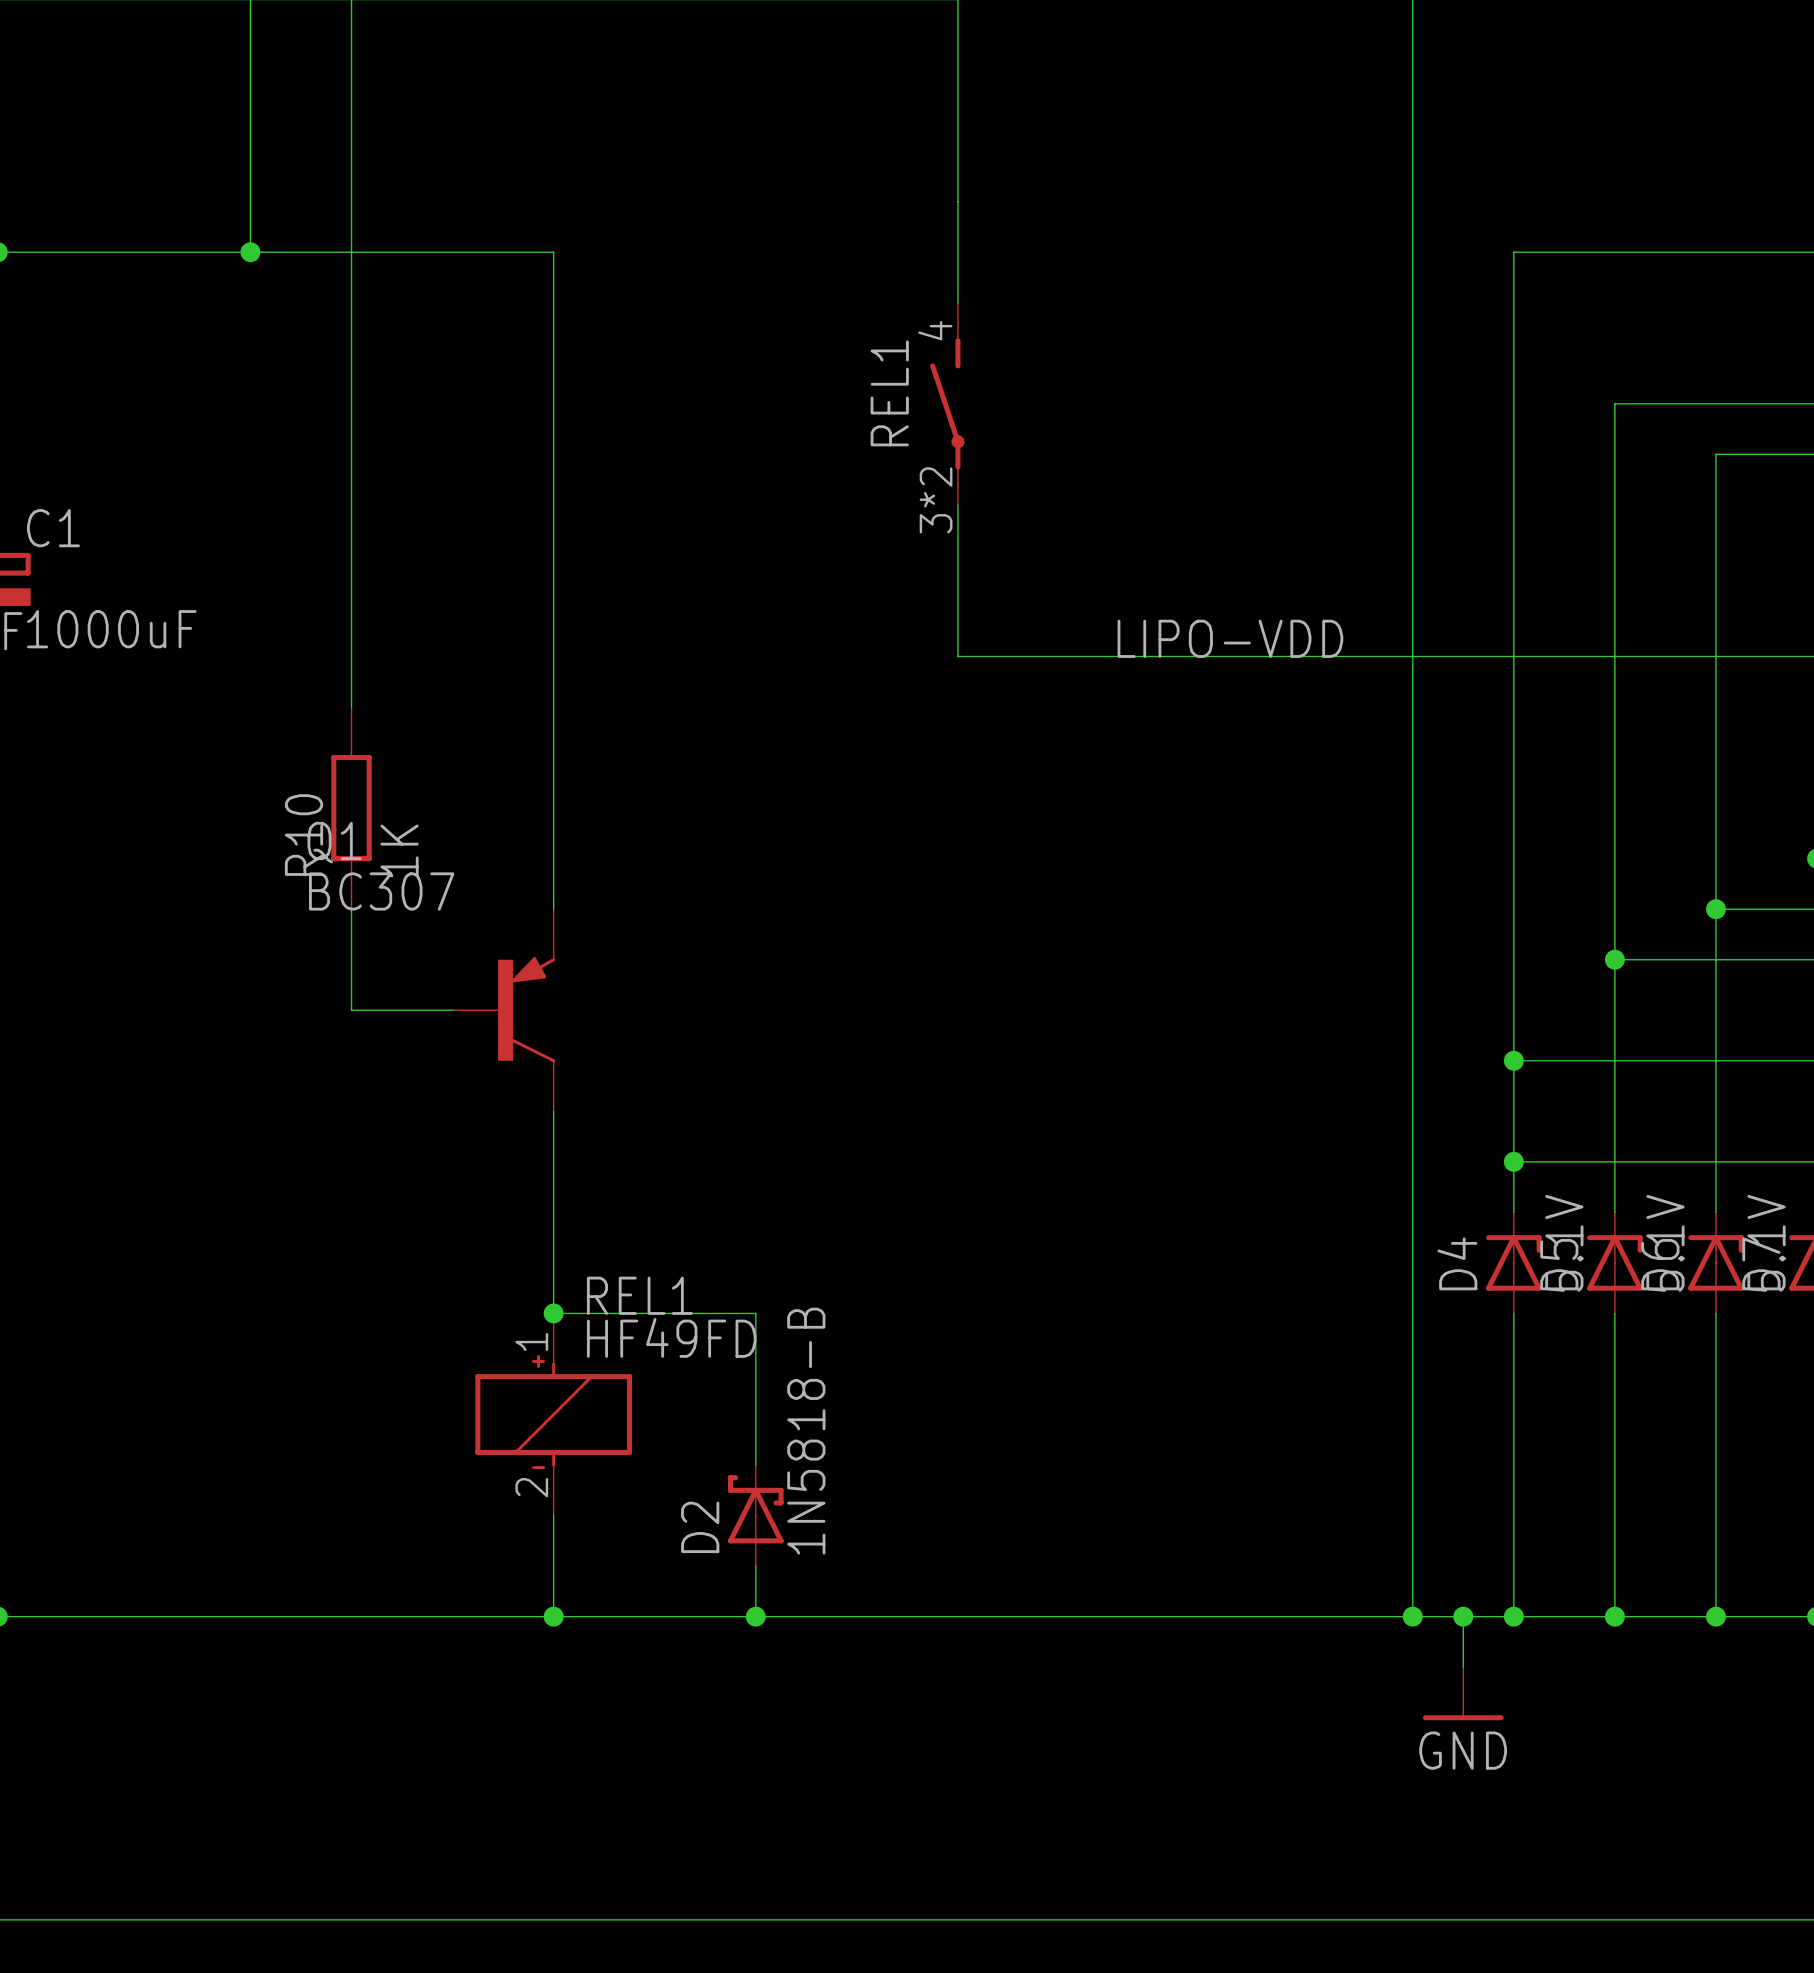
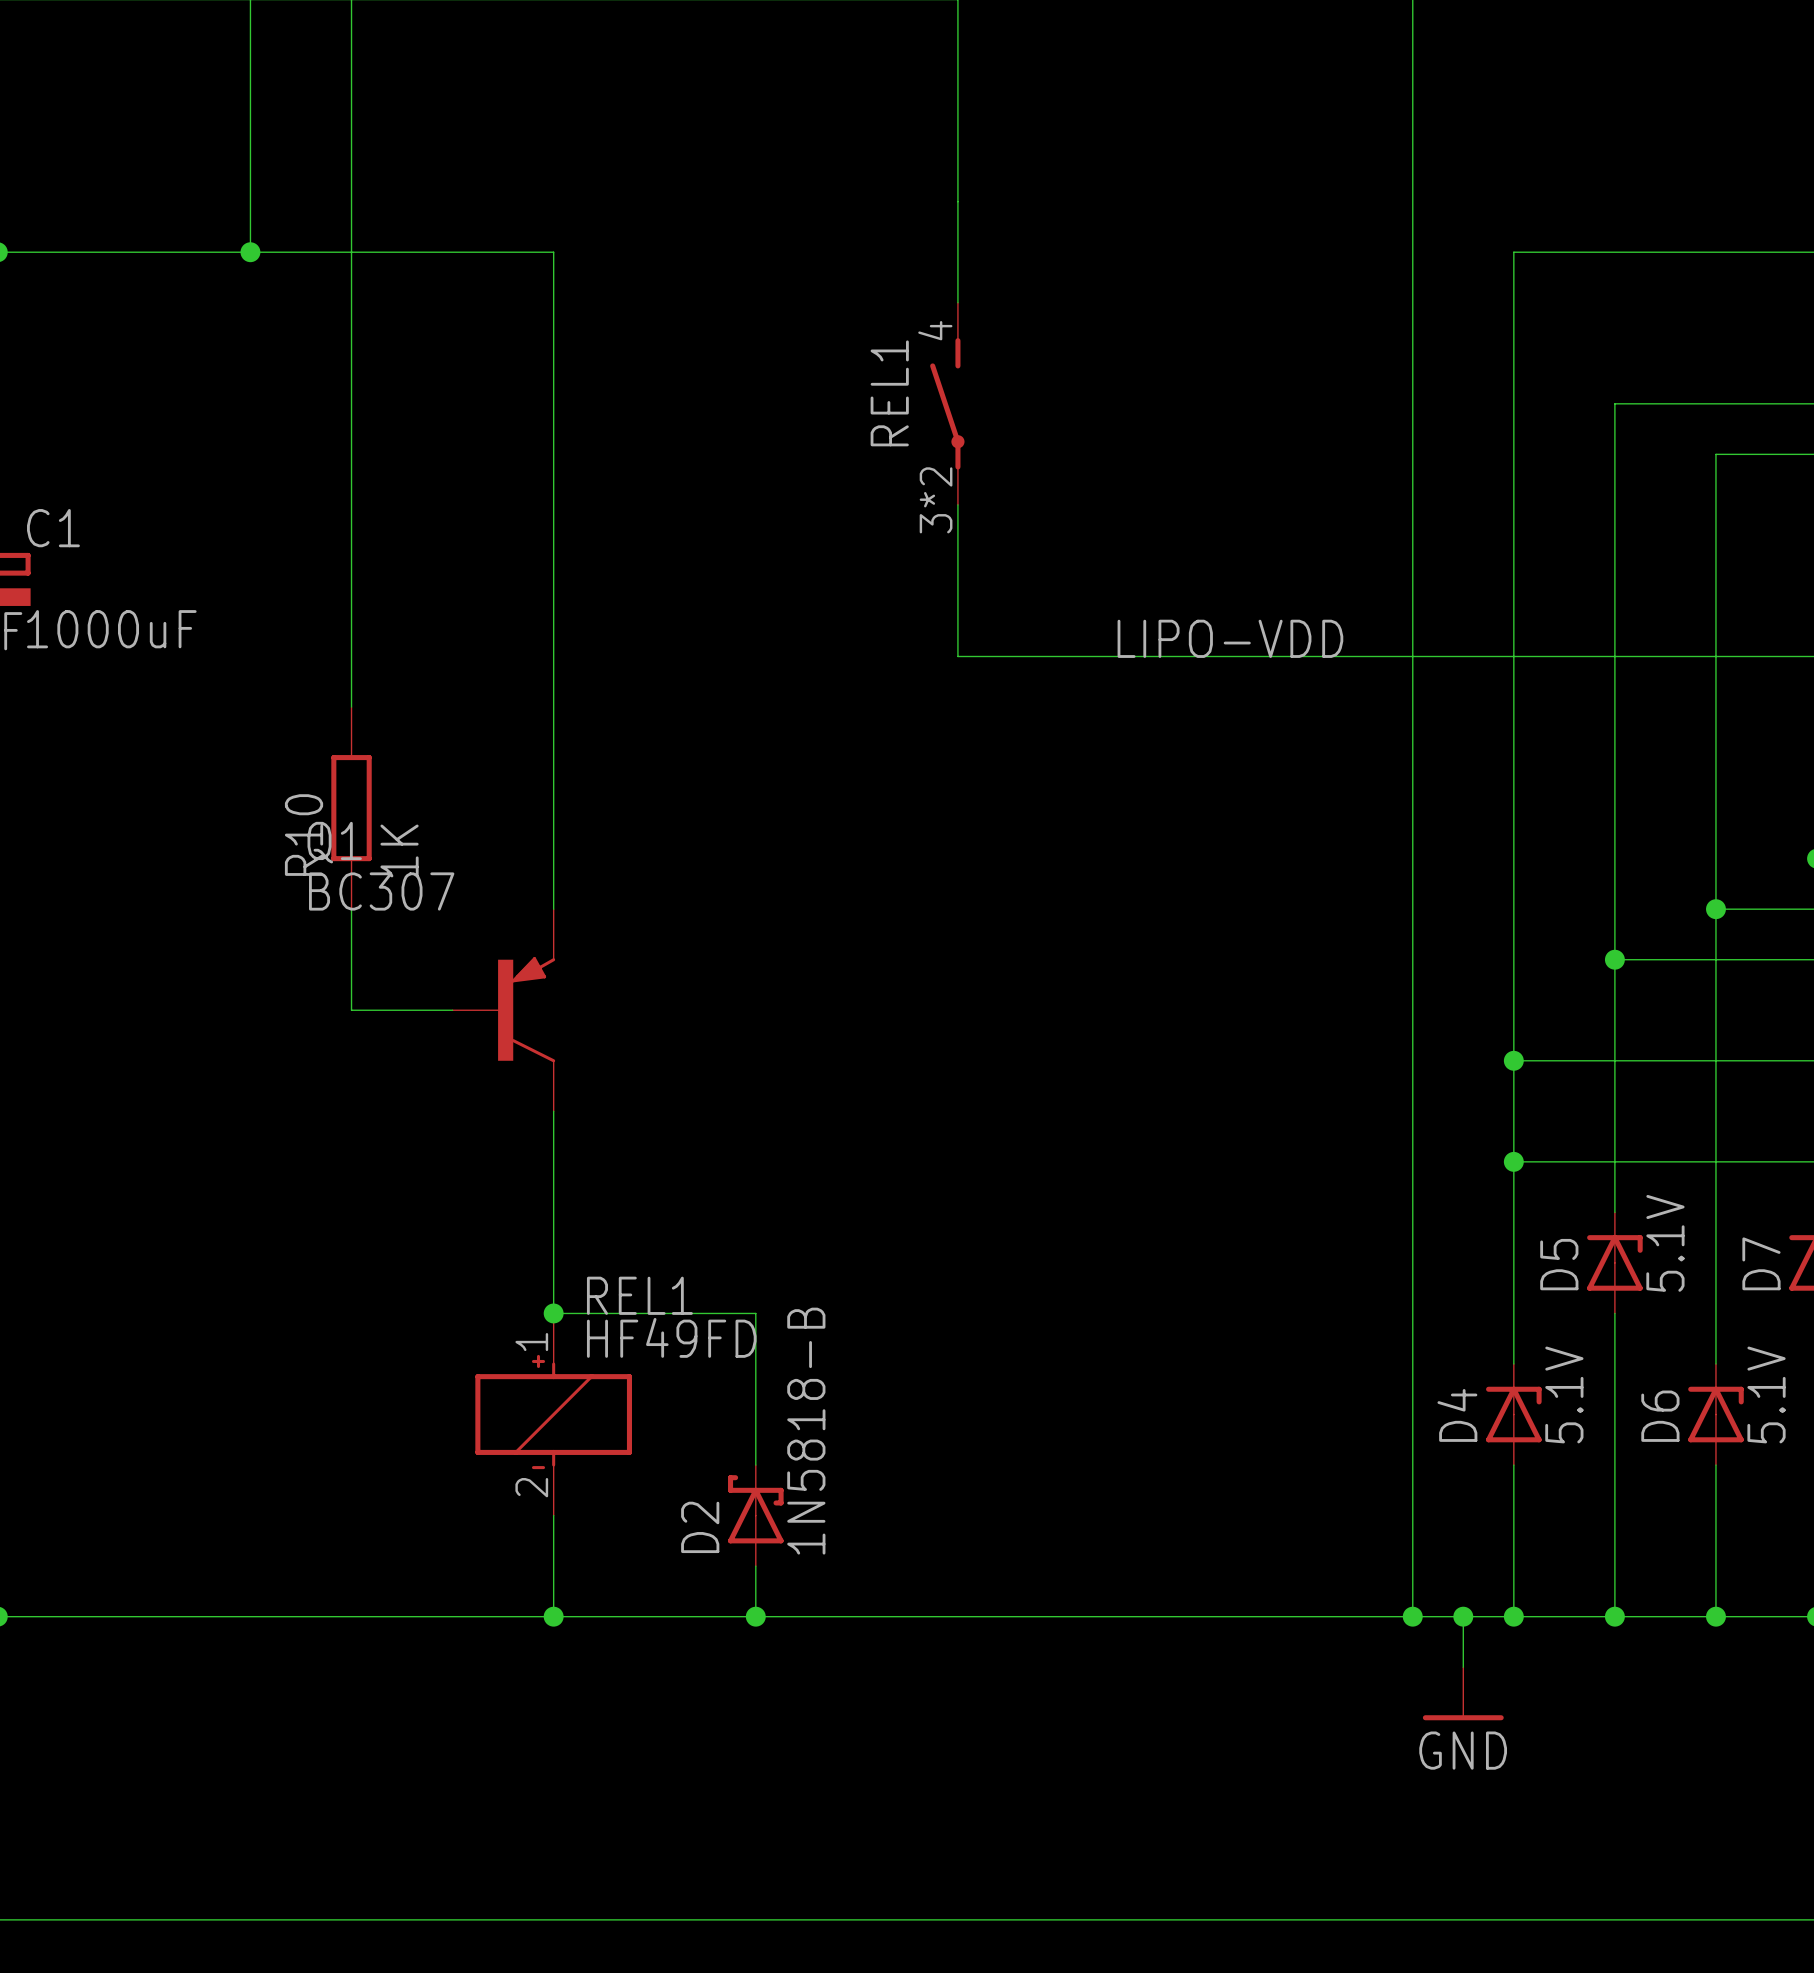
D4 position: (1513, 1262) -> (1513, 1414)
D6 position: (1715, 1262) -> (1715, 1414)

